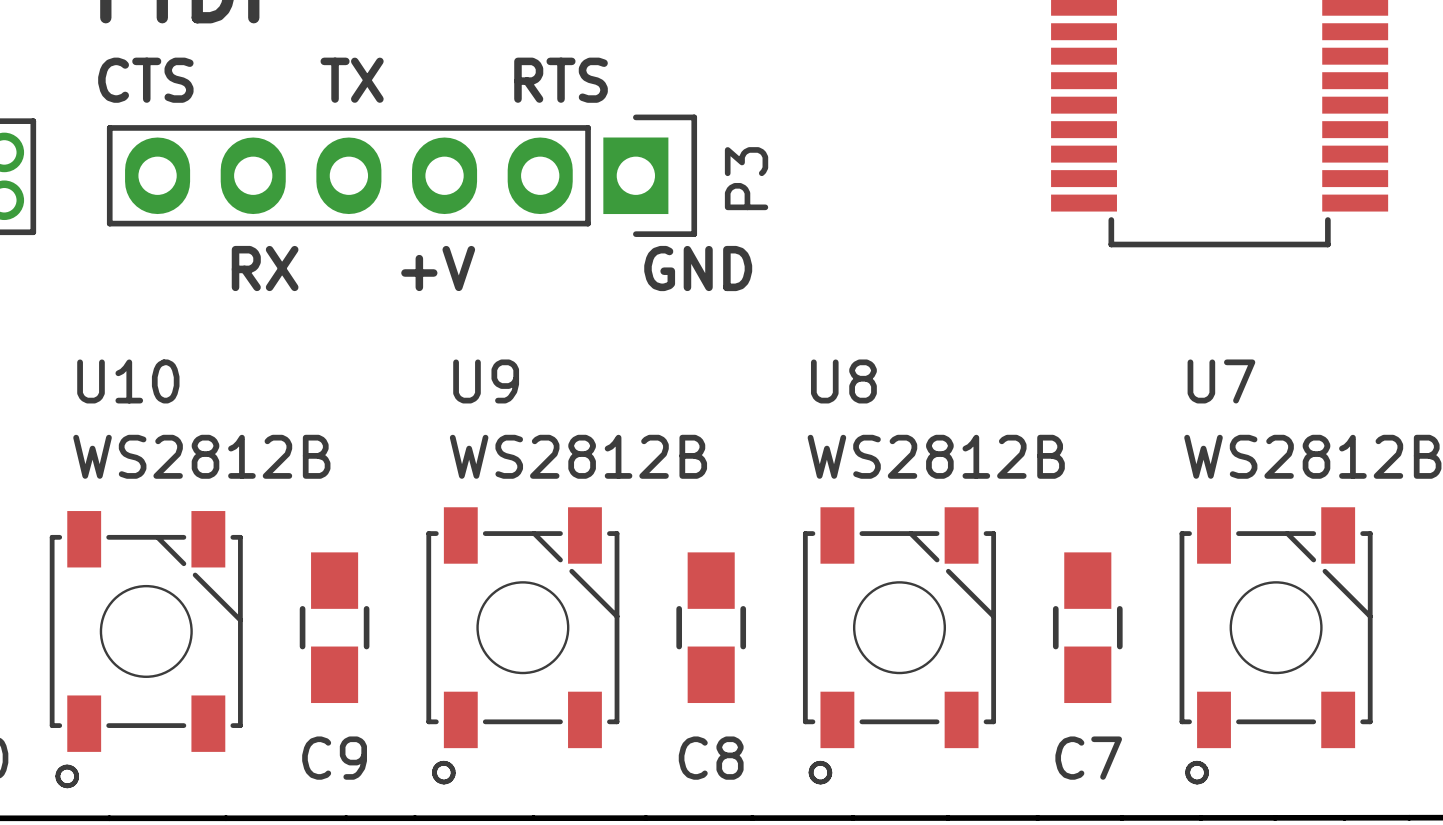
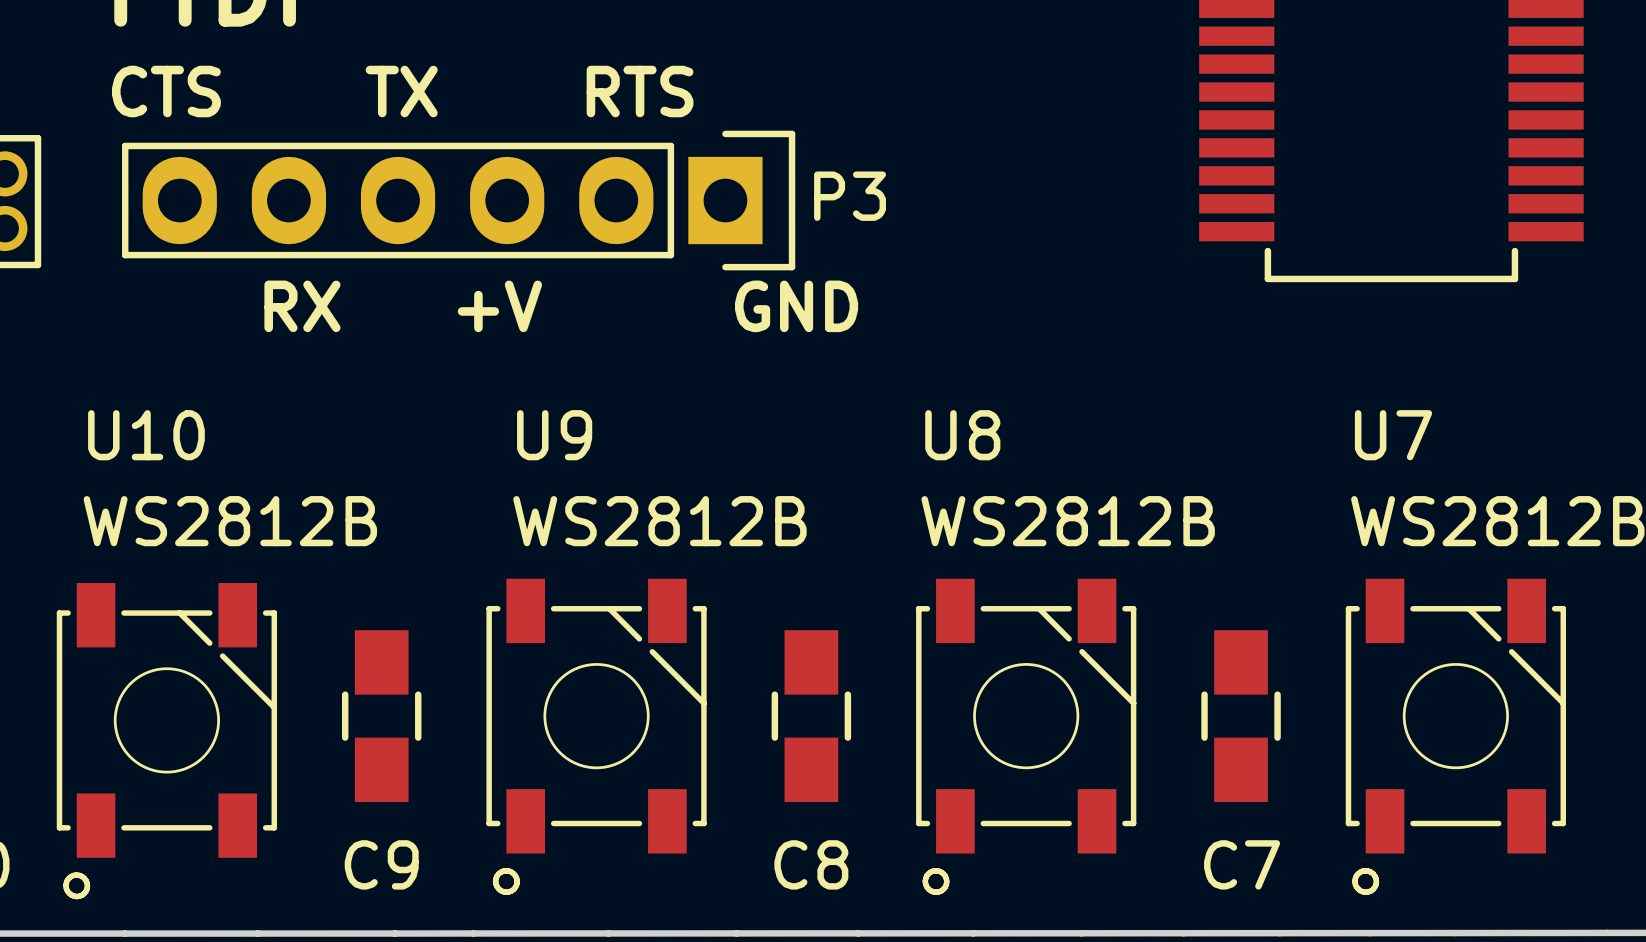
P3 name rotation: 0° (746, 178) -> 90° clockwise (850, 196)

